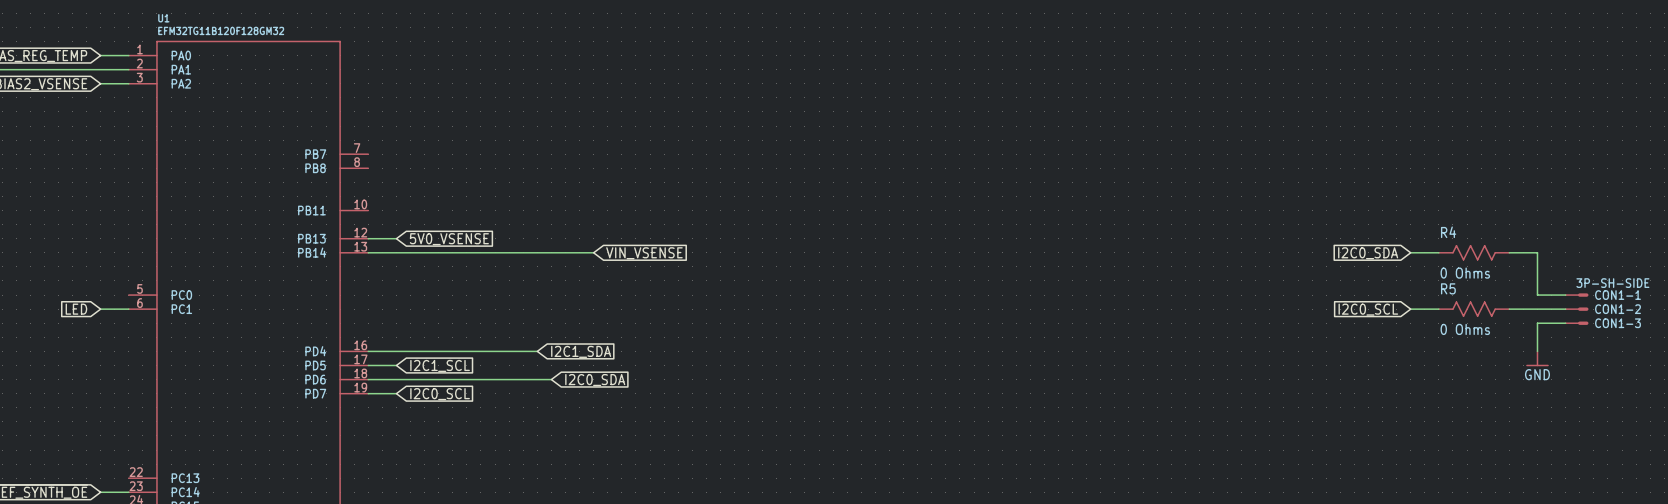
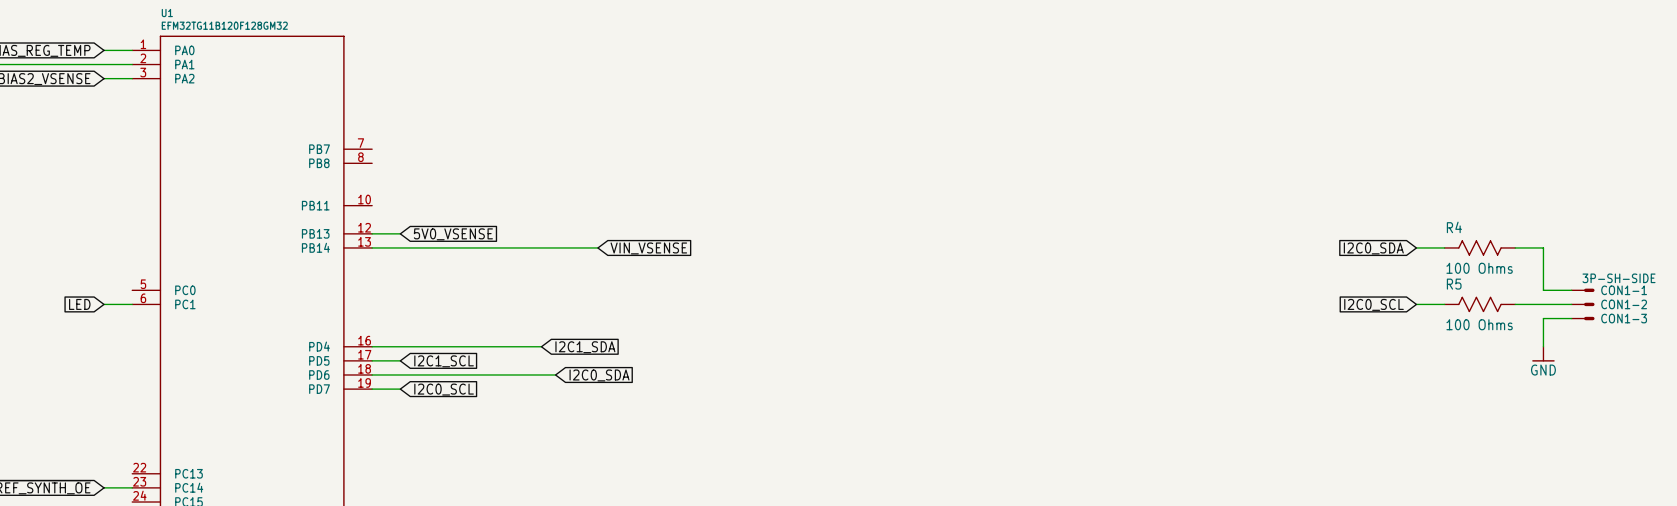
R4 value: 0 Ohms (1465, 273) -> 100 Ohms (1479, 268)
R5 value: 0 Ohms (1465, 329) -> 100 Ohms (1479, 324)

